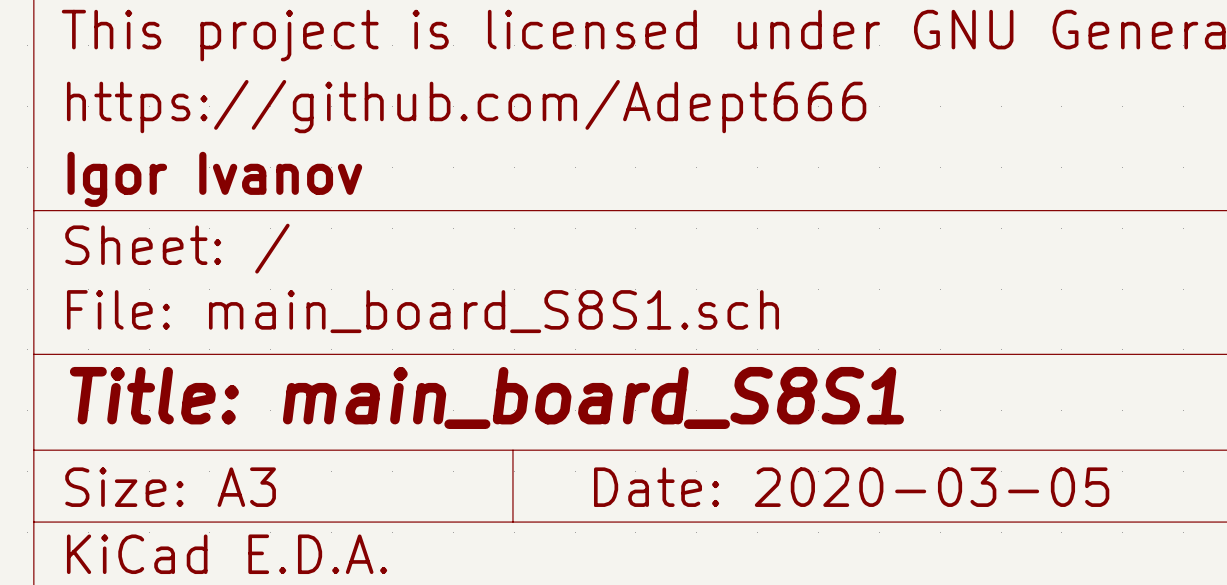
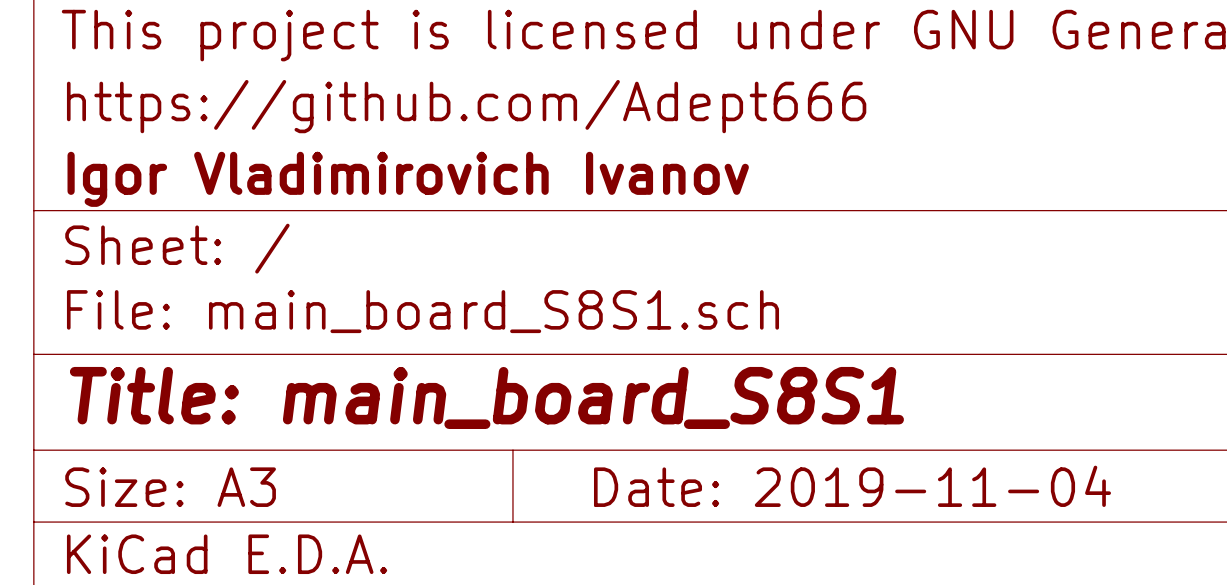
title block: Igor Ivanov (214, 179) -> Igor Vladimirovich Ivanov (408, 179)
title block: Date: 2020-03-05 (851, 487) -> Date: 2019-11-04 (852, 486)

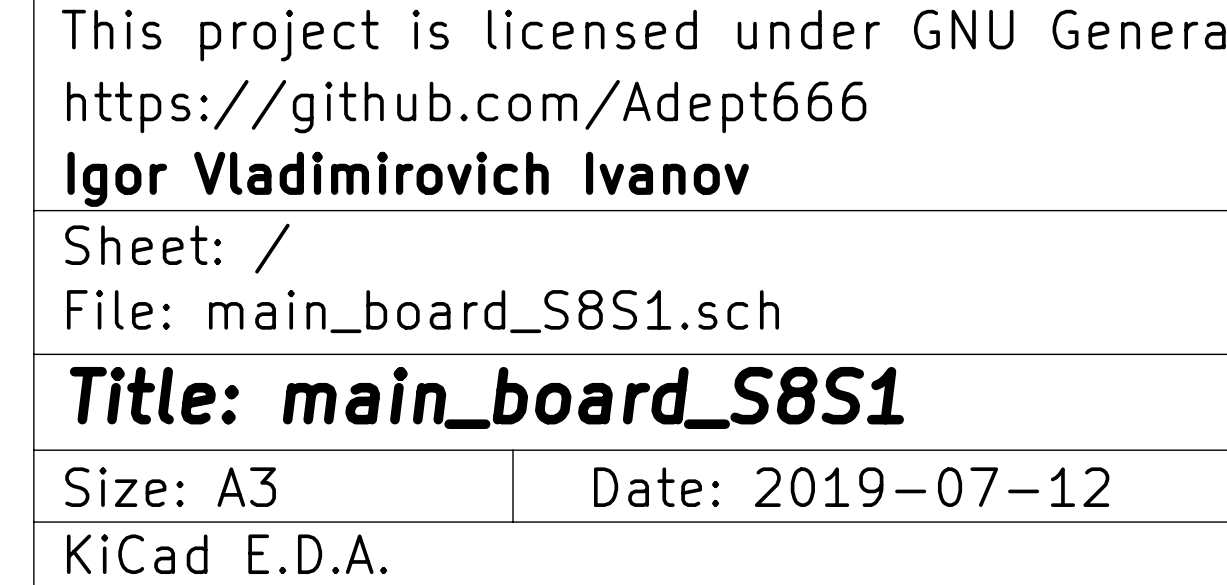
title block: Date: 2019-11-04 (852, 486) -> Date: 2019-07-12 (851, 487)

